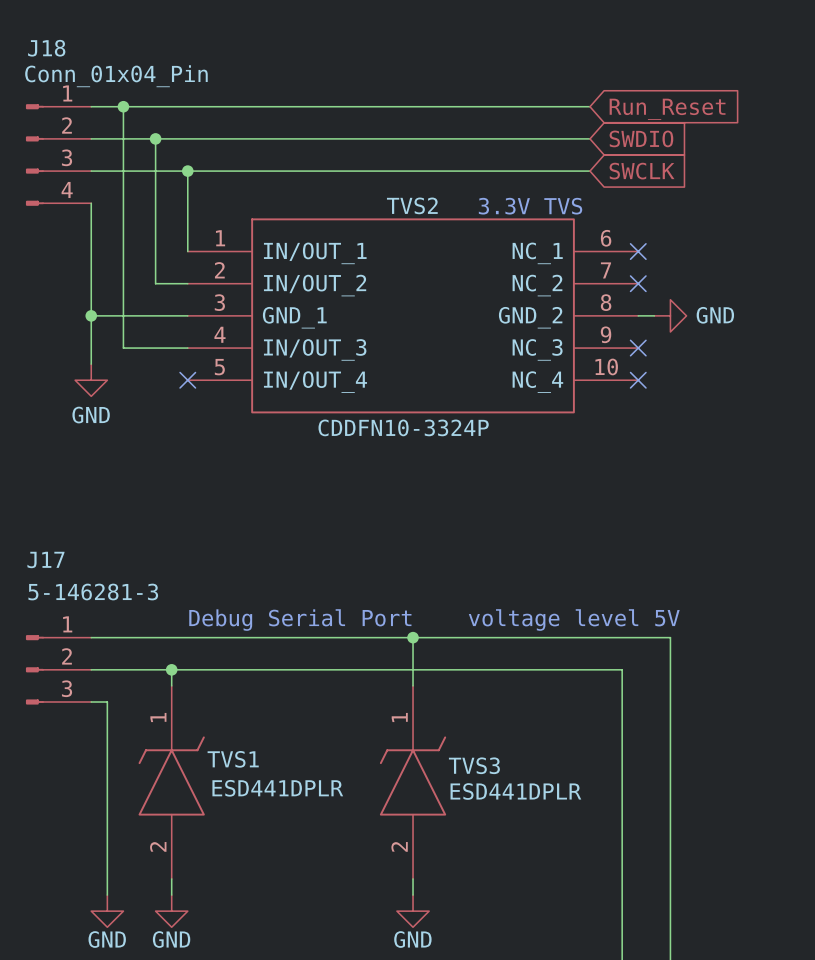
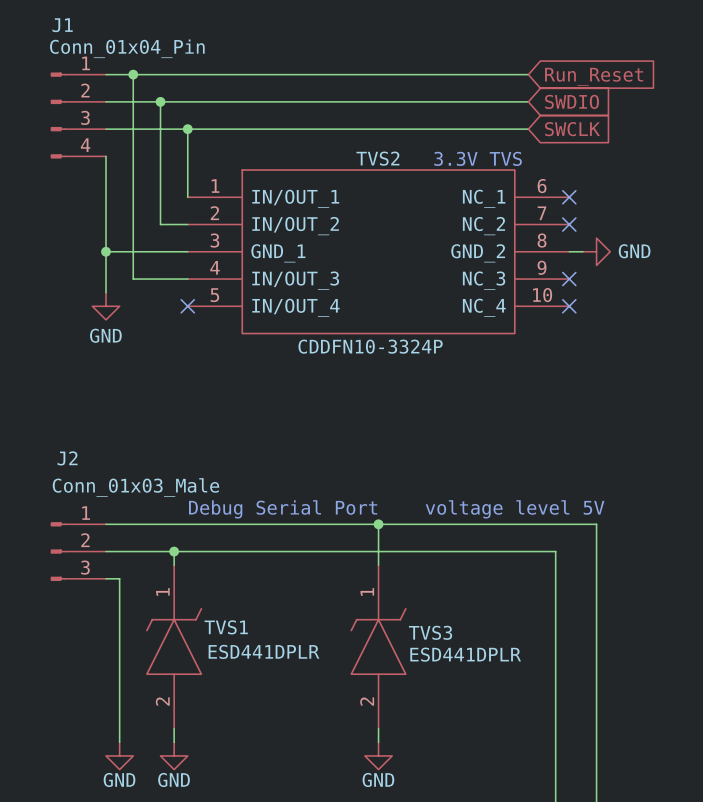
J18 name: J18 (46, 48) -> J1 (62, 25)
J17 name: J17 (45, 559) -> J2 (67, 458)
J17 value: 5-146281-3 (93, 592) -> Conn_01x03_Male (135, 487)

